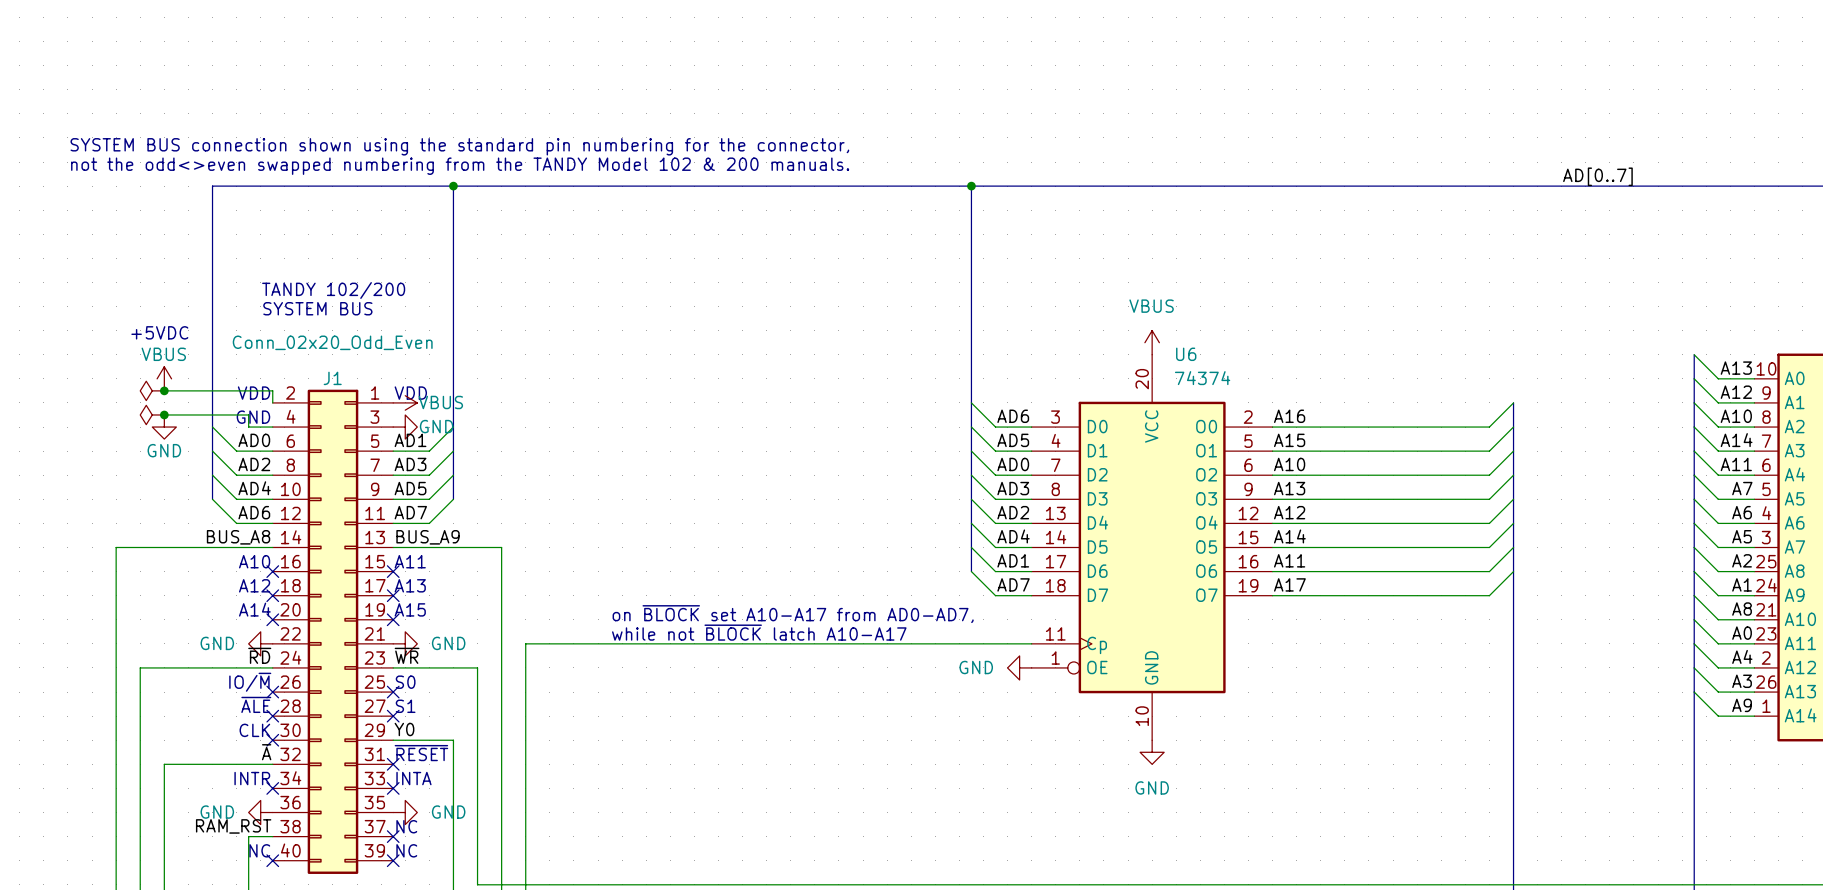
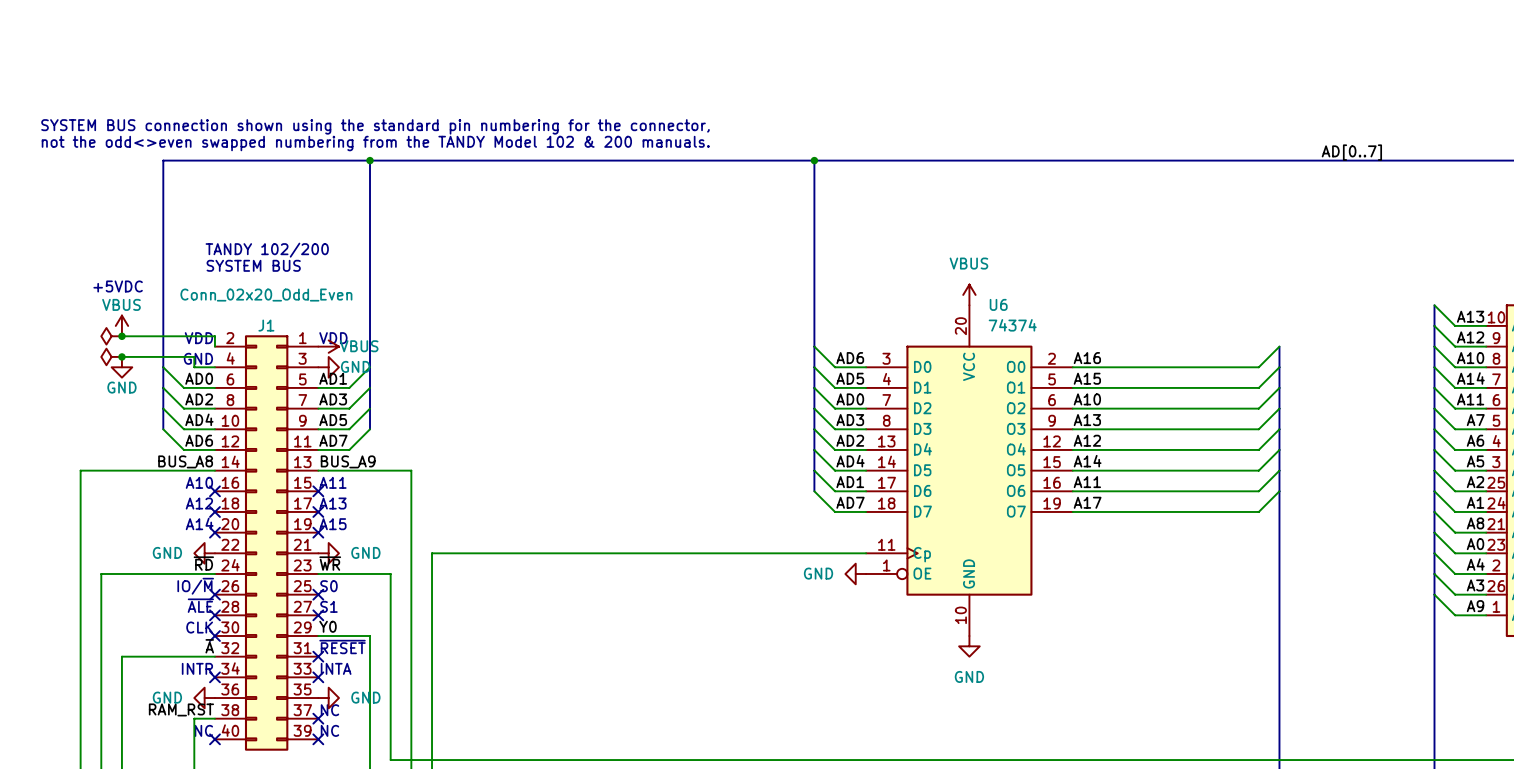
text: on ~{BLOCK} set A10-A17 from AD0-AD7, (793, 614) -> none
text: while not ~{BLOCK} latch A10-A17 (759, 632) -> none

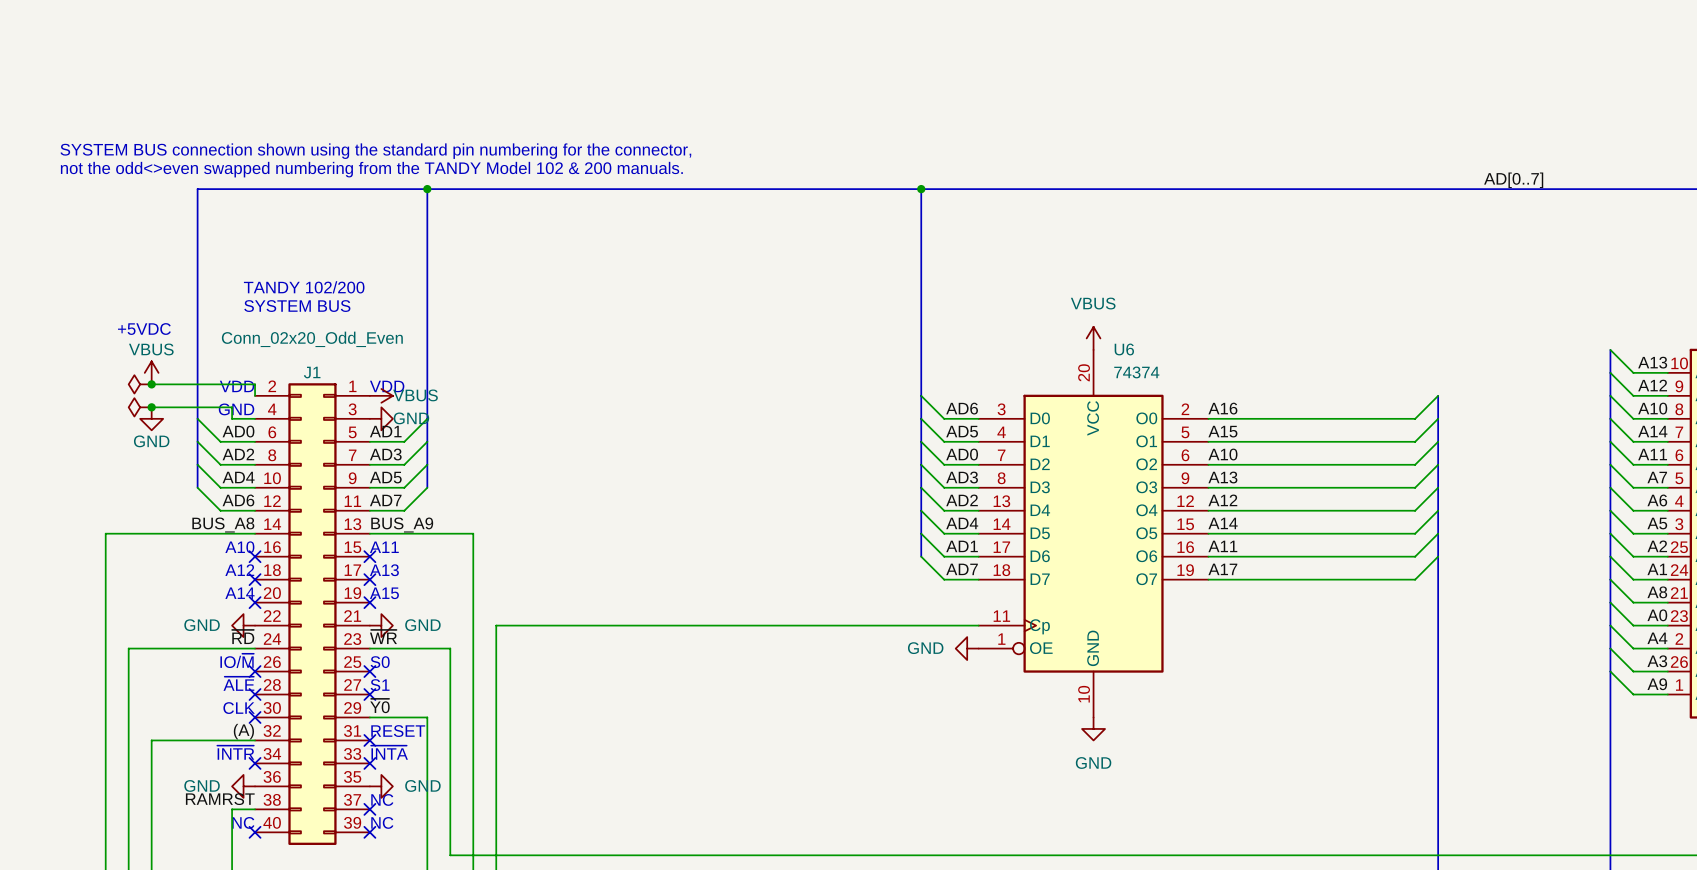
label: Y0 (328, 626) -> ~{Y0} (379, 705)
label: ~{A} (209, 646) -> (A) (243, 731)
text: ~{RESET} (342, 647) -> RESET (398, 731)
text: INTR (197, 668) -> ~{INTR} (235, 752)
text: INTA (336, 668) -> ~{INTA} (389, 752)
label: RAM_RST (181, 709) -> RAMRST (220, 799)

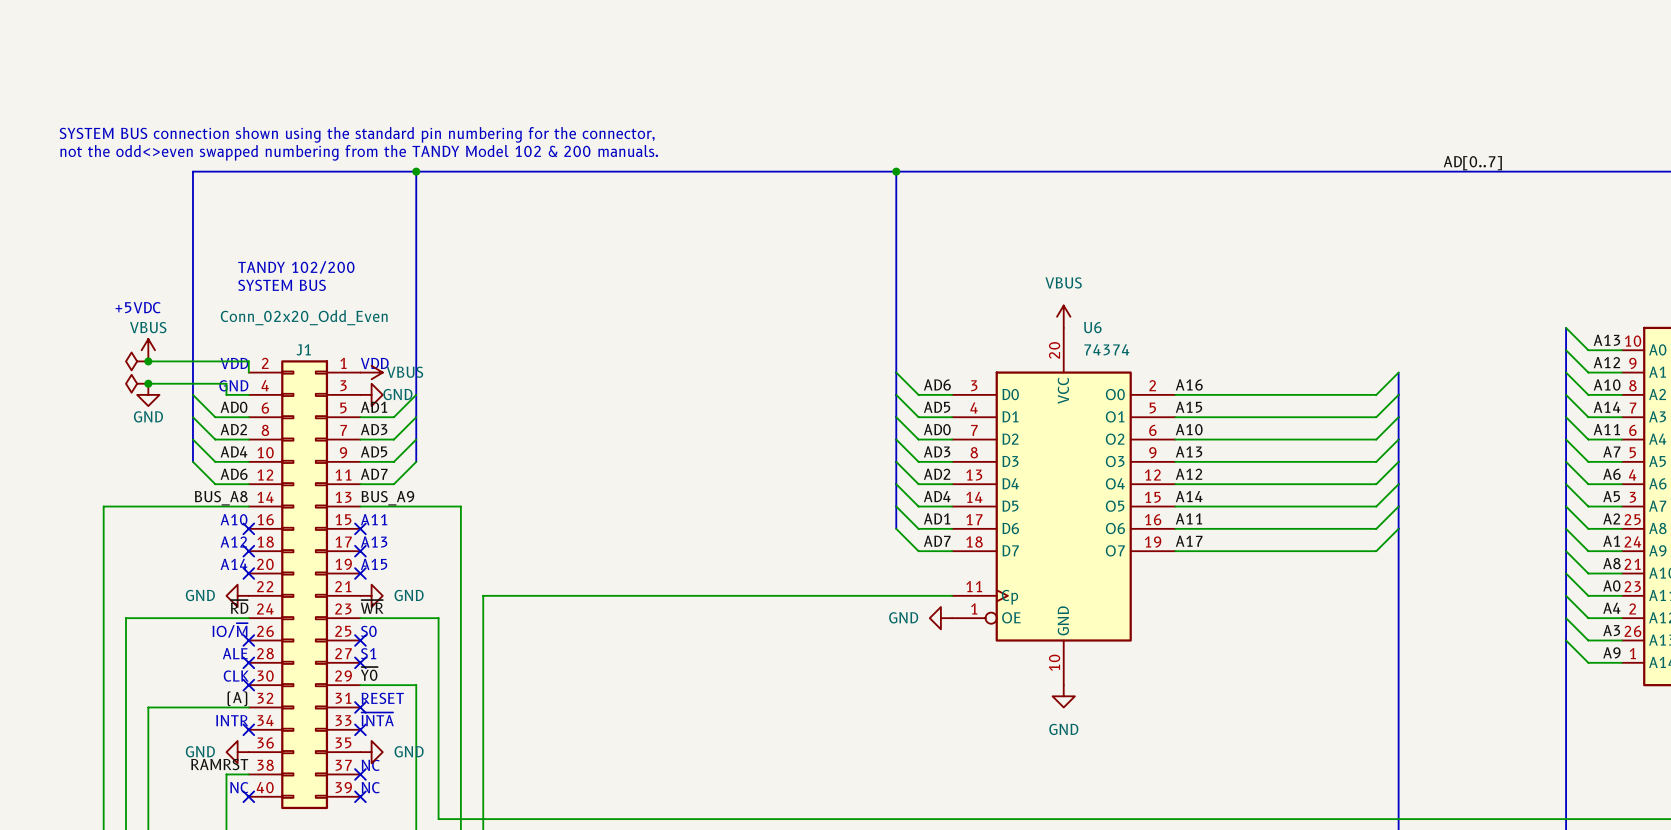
text: ~{ALE} (238, 683) -> ALE (235, 653)
text: ~{INTR} (235, 752) -> INTR (232, 720)

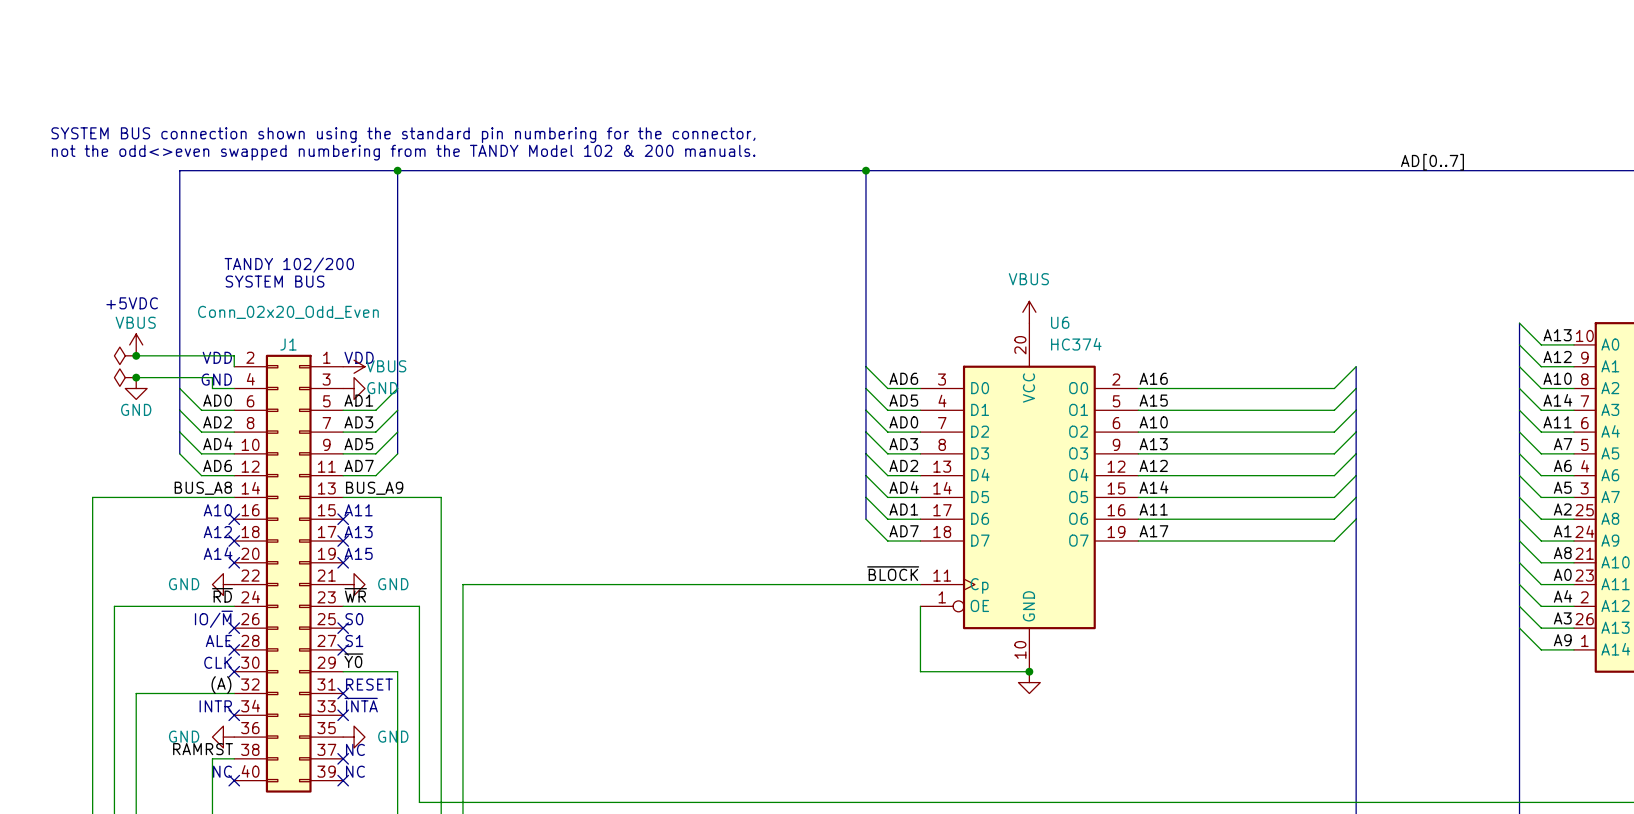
U6 value: 74374 (1106, 349) -> HC374 (1076, 344)
label: none -> ~{BLOCK} (893, 573)
power symbol: GND (940, 618) -> none
wire: none -> (920, 606) (920, 671) (1029, 671)
junction: none -> (1029, 671)
power symbol text: GND (1063, 729) -> none

